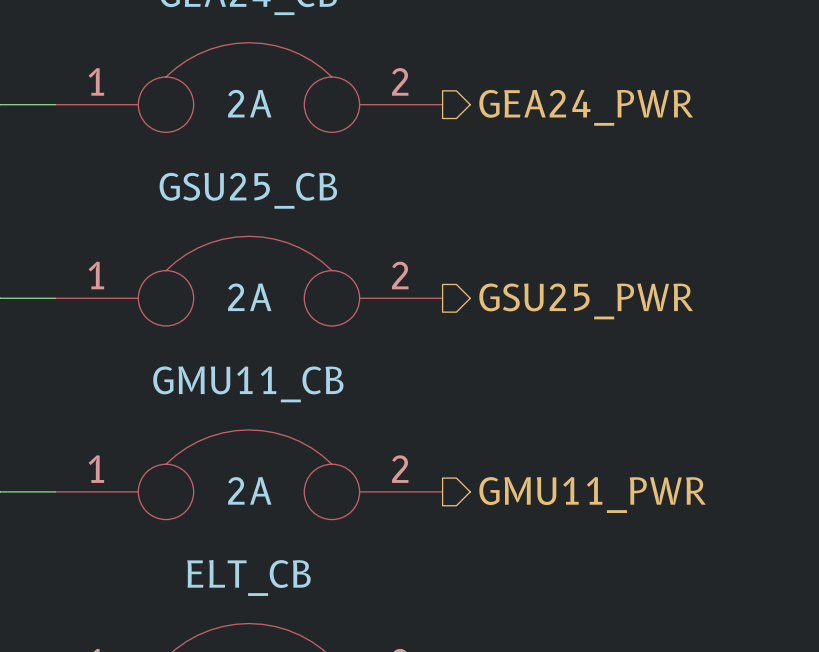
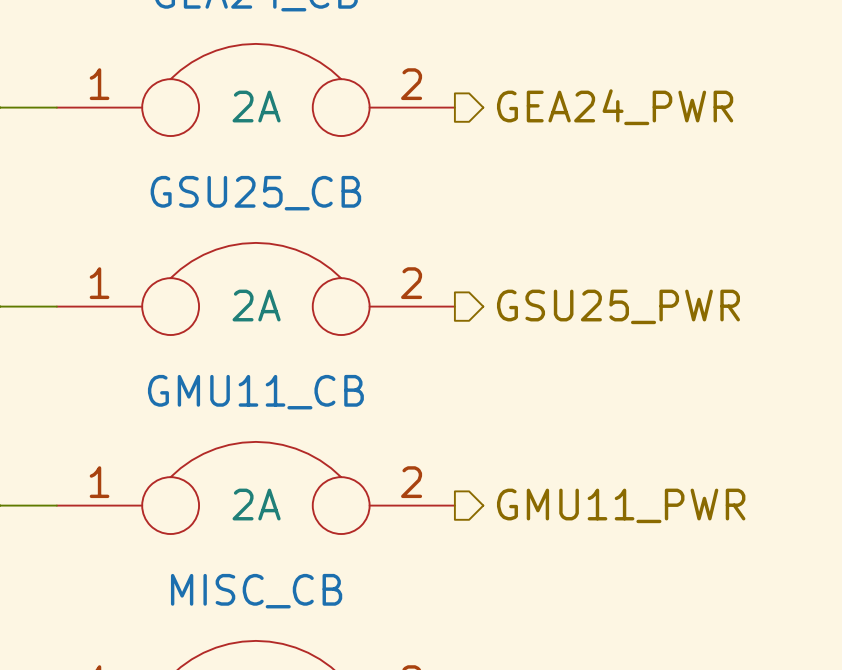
ELT_CB name: ELT_CB (248, 577) -> MISC_CB (256, 591)

